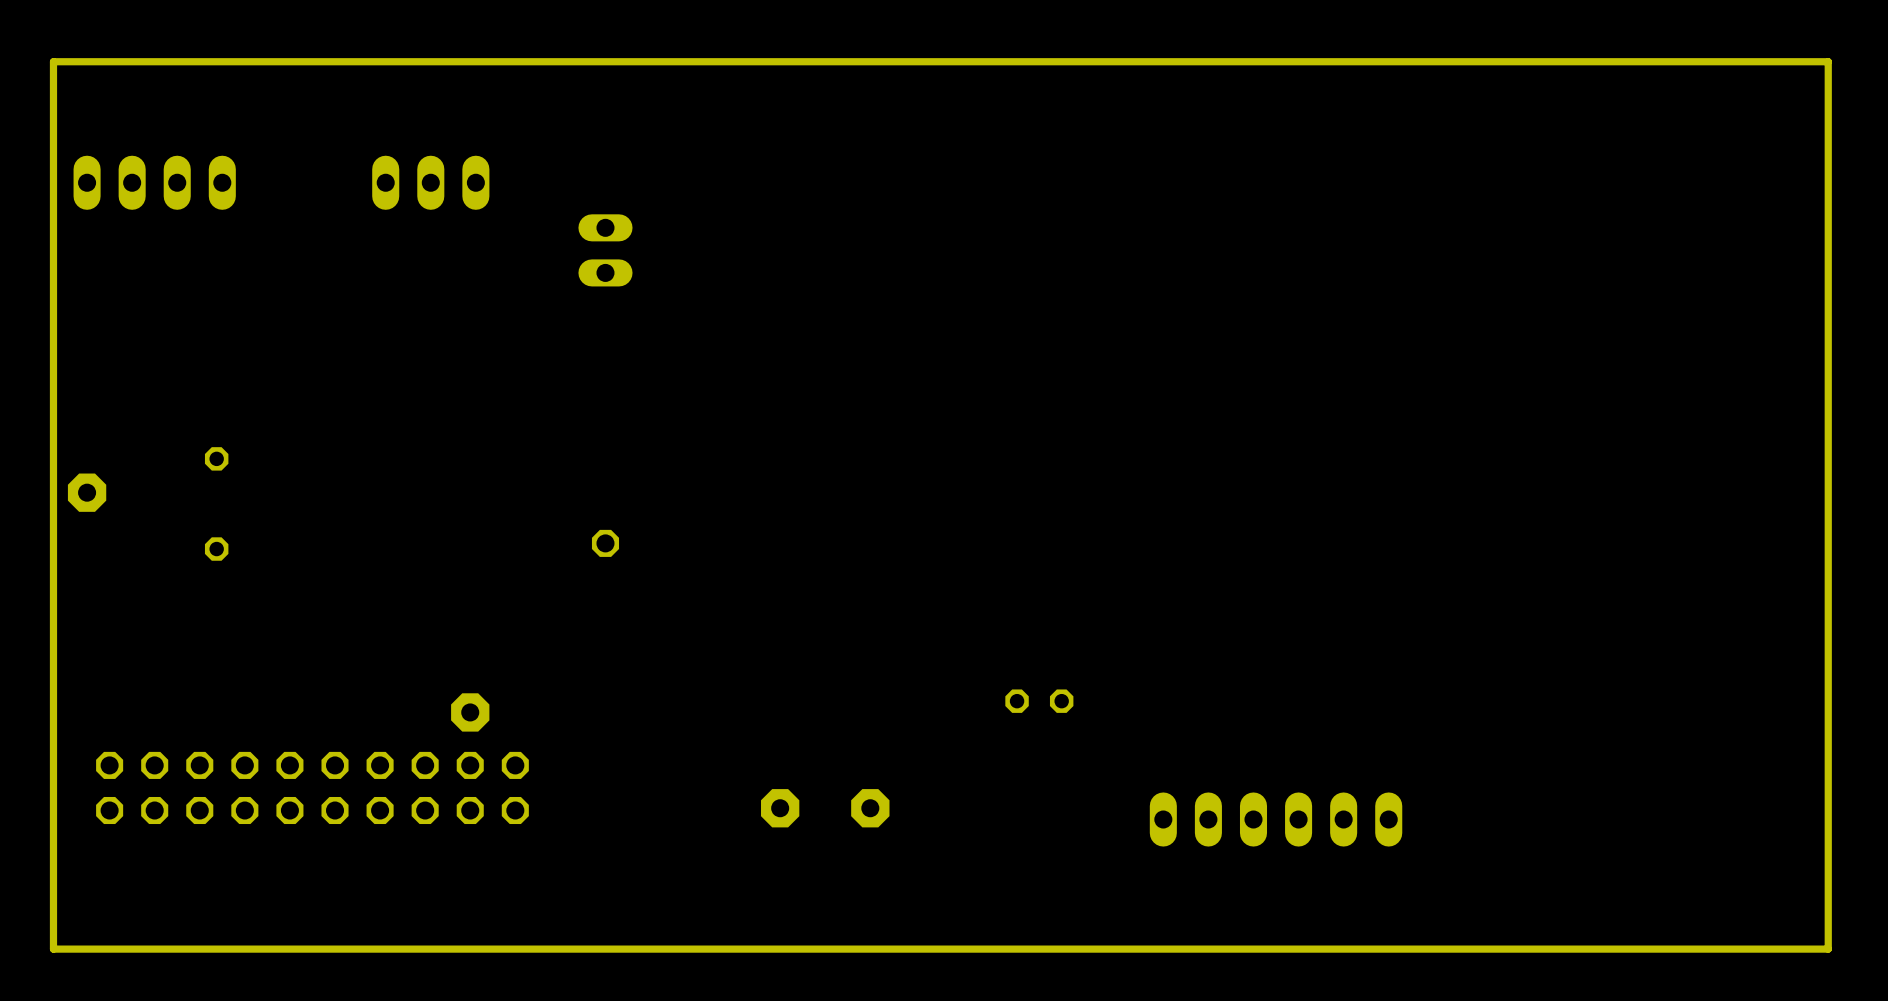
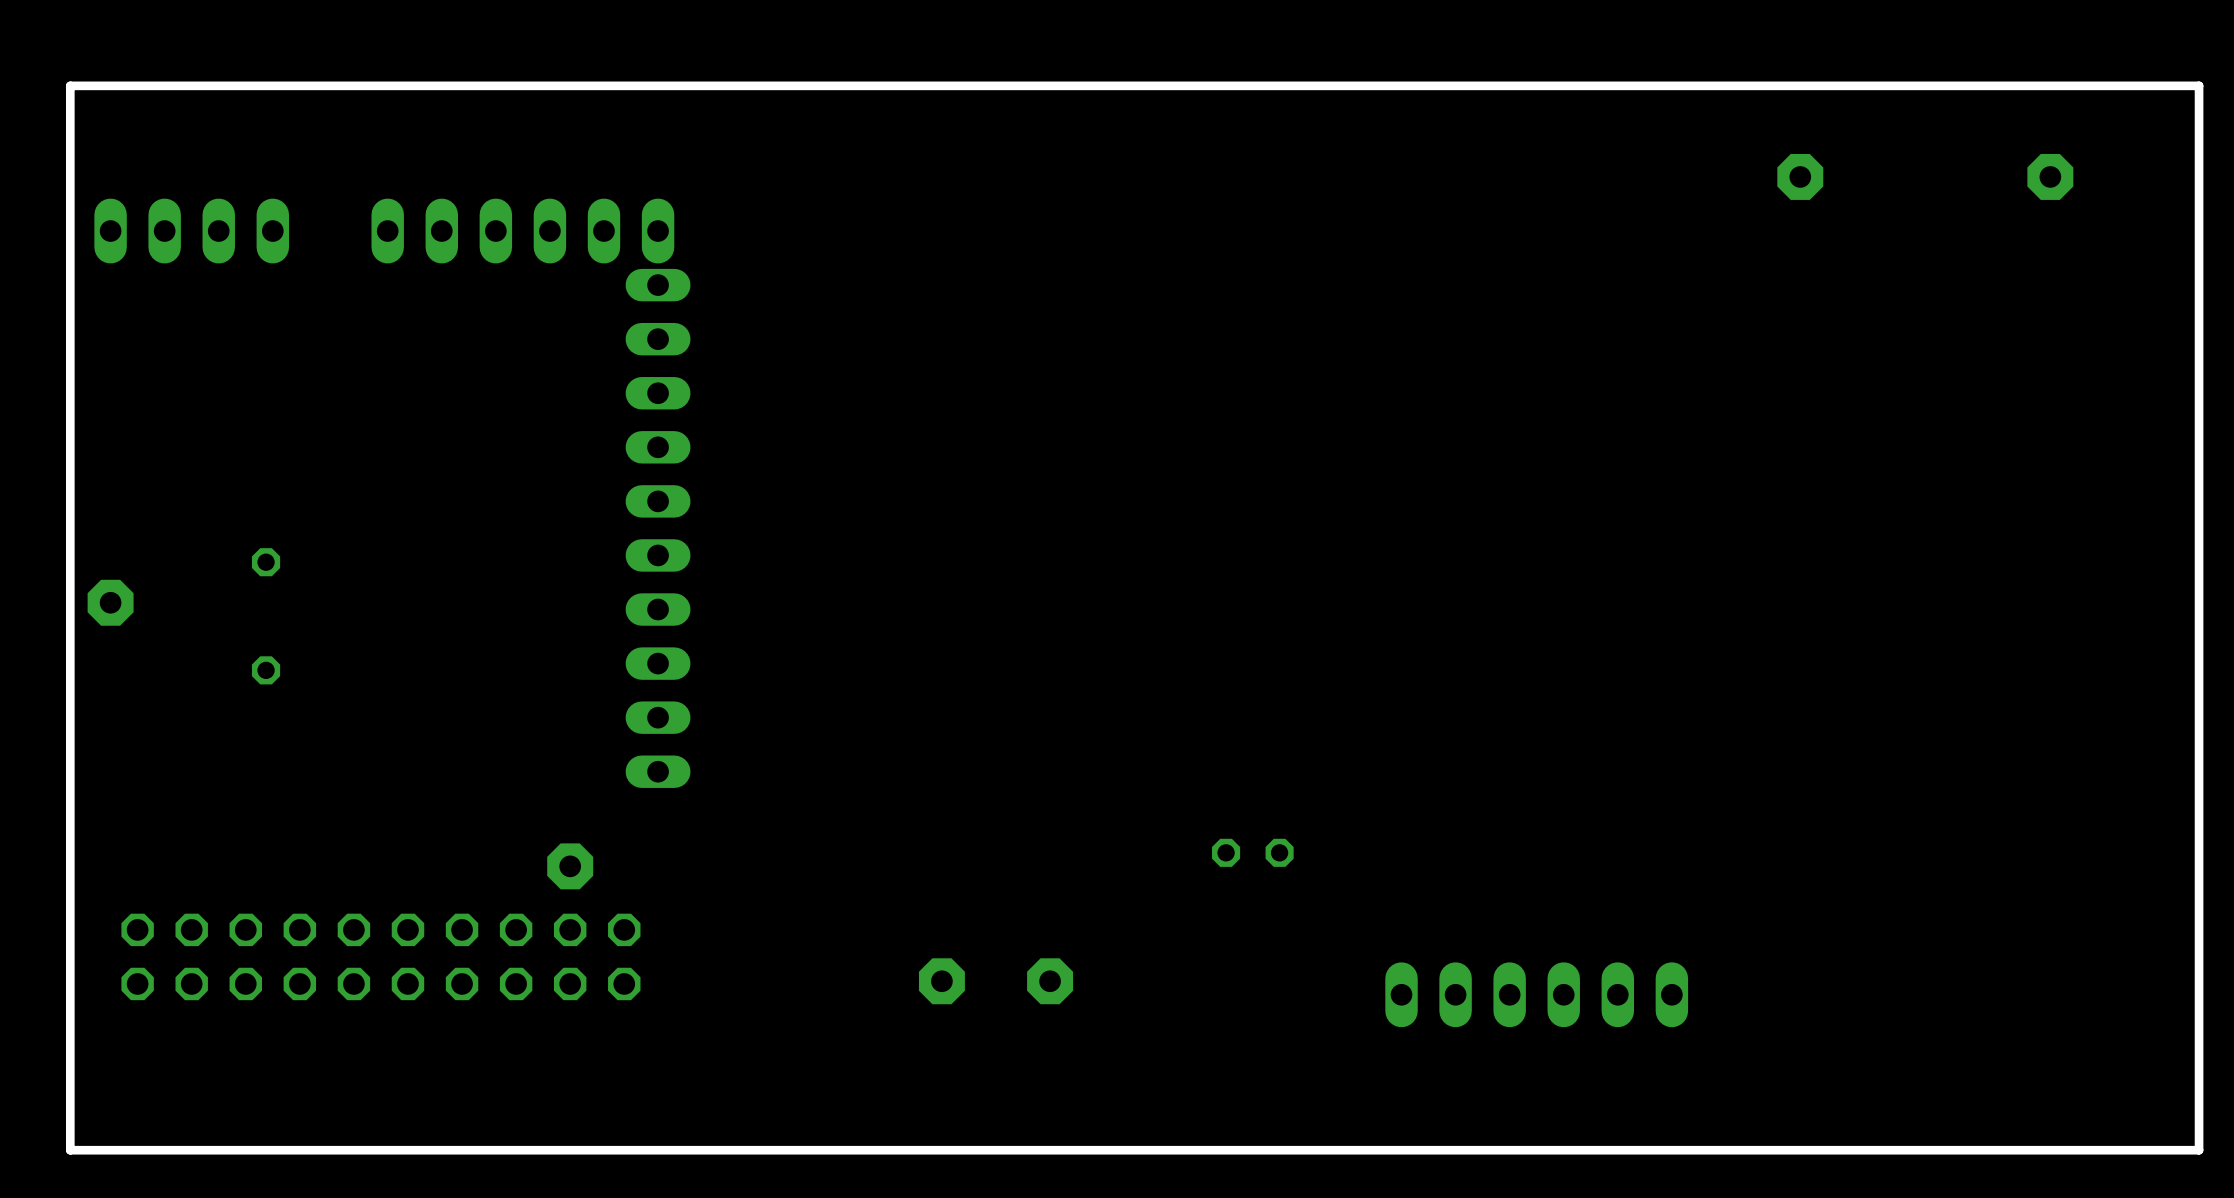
part: none -> (1800, 176)
part: none -> (2050, 176)
part footprint: [372, 155, 490, 210] -> [371, 198, 675, 264]
part: (605, 250) -> none
part: none -> (658, 528)
part: (605, 543) -> none

